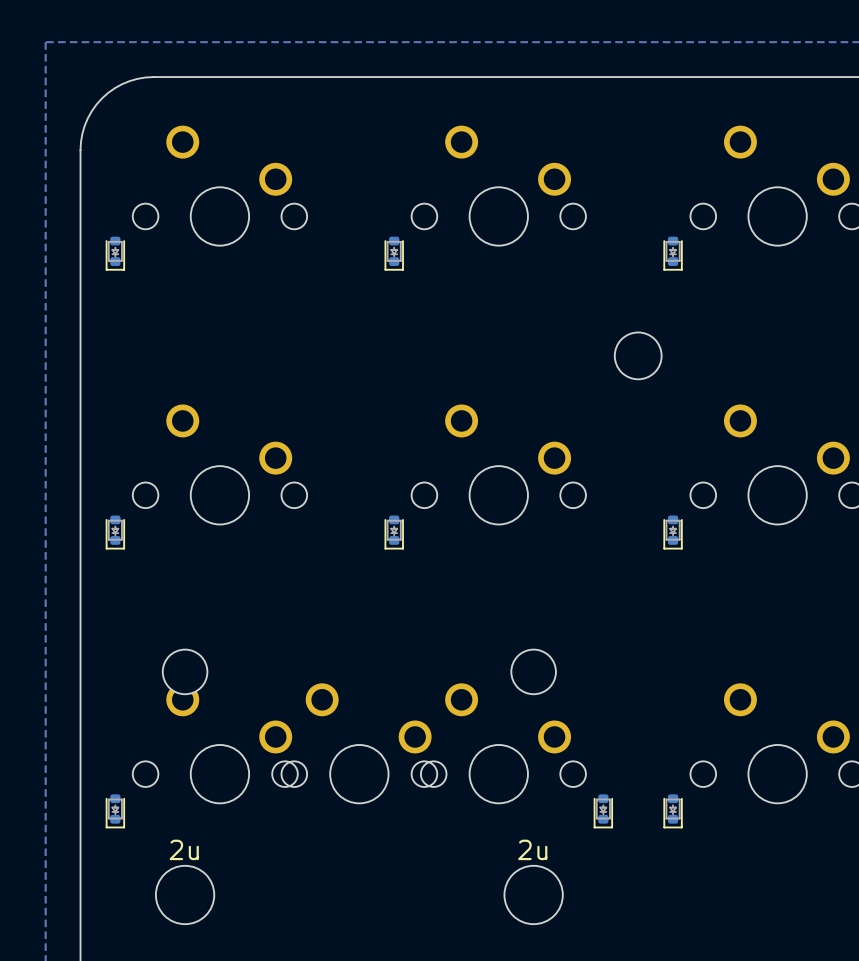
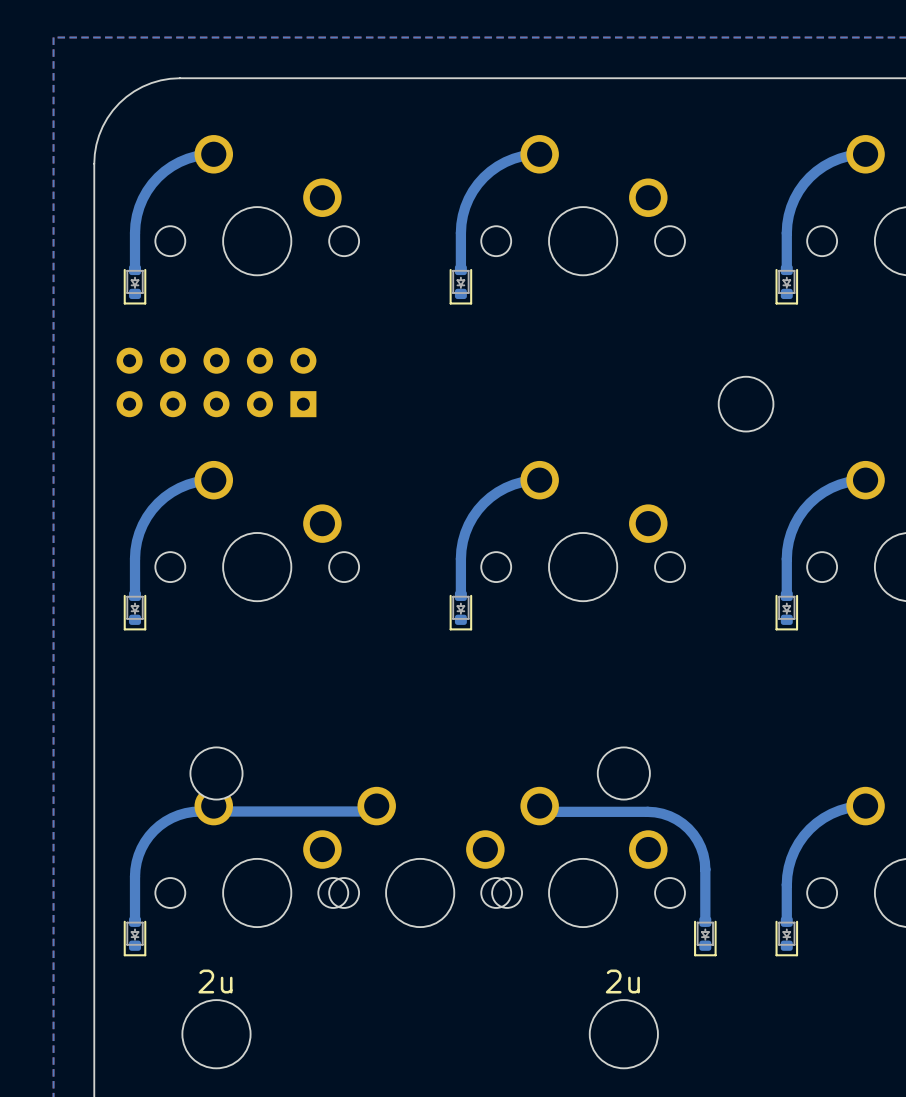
bottom track: none -> (213, 154) (196, 156) (179, 162) (164, 171) (147, 191) (139, 207) (135, 224) (135, 269)
bottom track: none -> (539, 154) (513, 158) (497, 166) (483, 177) (472, 191) (465, 207) (461, 224) (460, 269)
bottom track: none -> (865, 154) (839, 158) (823, 166) (809, 177) (798, 191) (791, 207) (787, 224) (786, 269)
part: none -> (216, 382)
bottom track: none -> (213, 480) (196, 482) (179, 487) (164, 497) (147, 517) (139, 532) (135, 550) (135, 595)
bottom track: none -> (539, 480) (513, 484) (497, 492) (483, 503) (472, 517) (465, 532) (461, 550) (460, 595)
bottom track: none -> (865, 480) (848, 482) (831, 487) (816, 497) (798, 517) (791, 532) (787, 550) (786, 595)
bottom track: none -> (865, 806) (848, 808) (831, 813) (816, 823) (798, 842) (791, 858) (787, 876) (786, 921)
bottom track: none -> (371, 811) (200, 811) (185, 813) (171, 817) (159, 825) (149, 836) (138, 855) (135, 876) (135, 921)
bottom track: none -> (545, 811) (655, 812) (669, 816) (682, 823) (697, 840) (703, 854) (705, 869) (705, 921)

